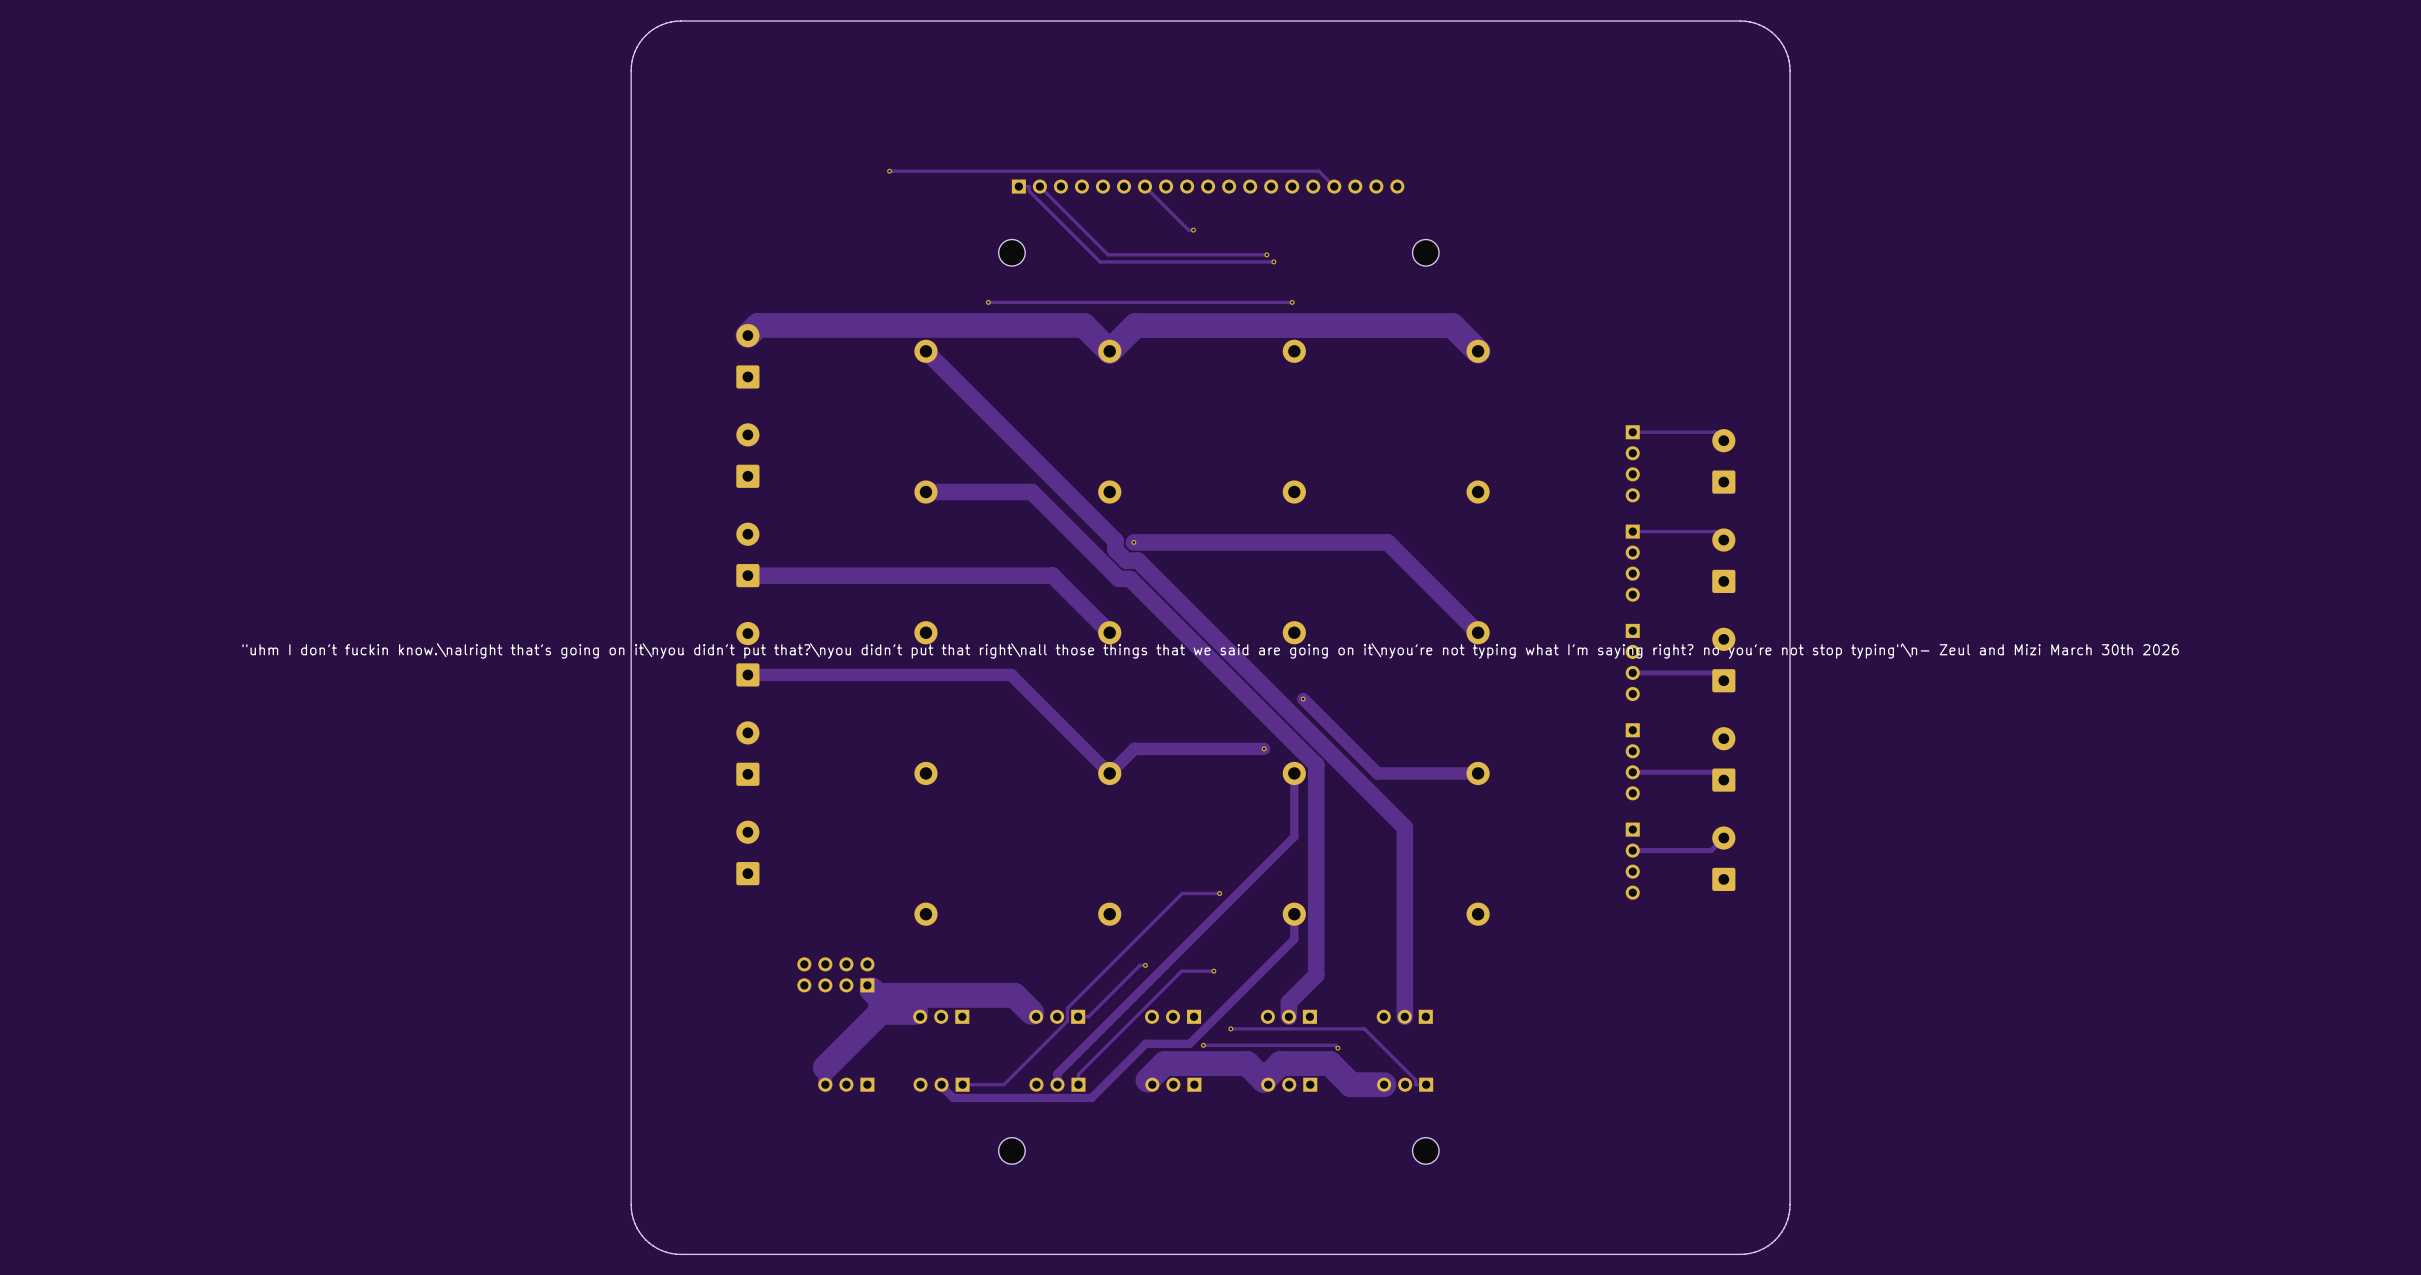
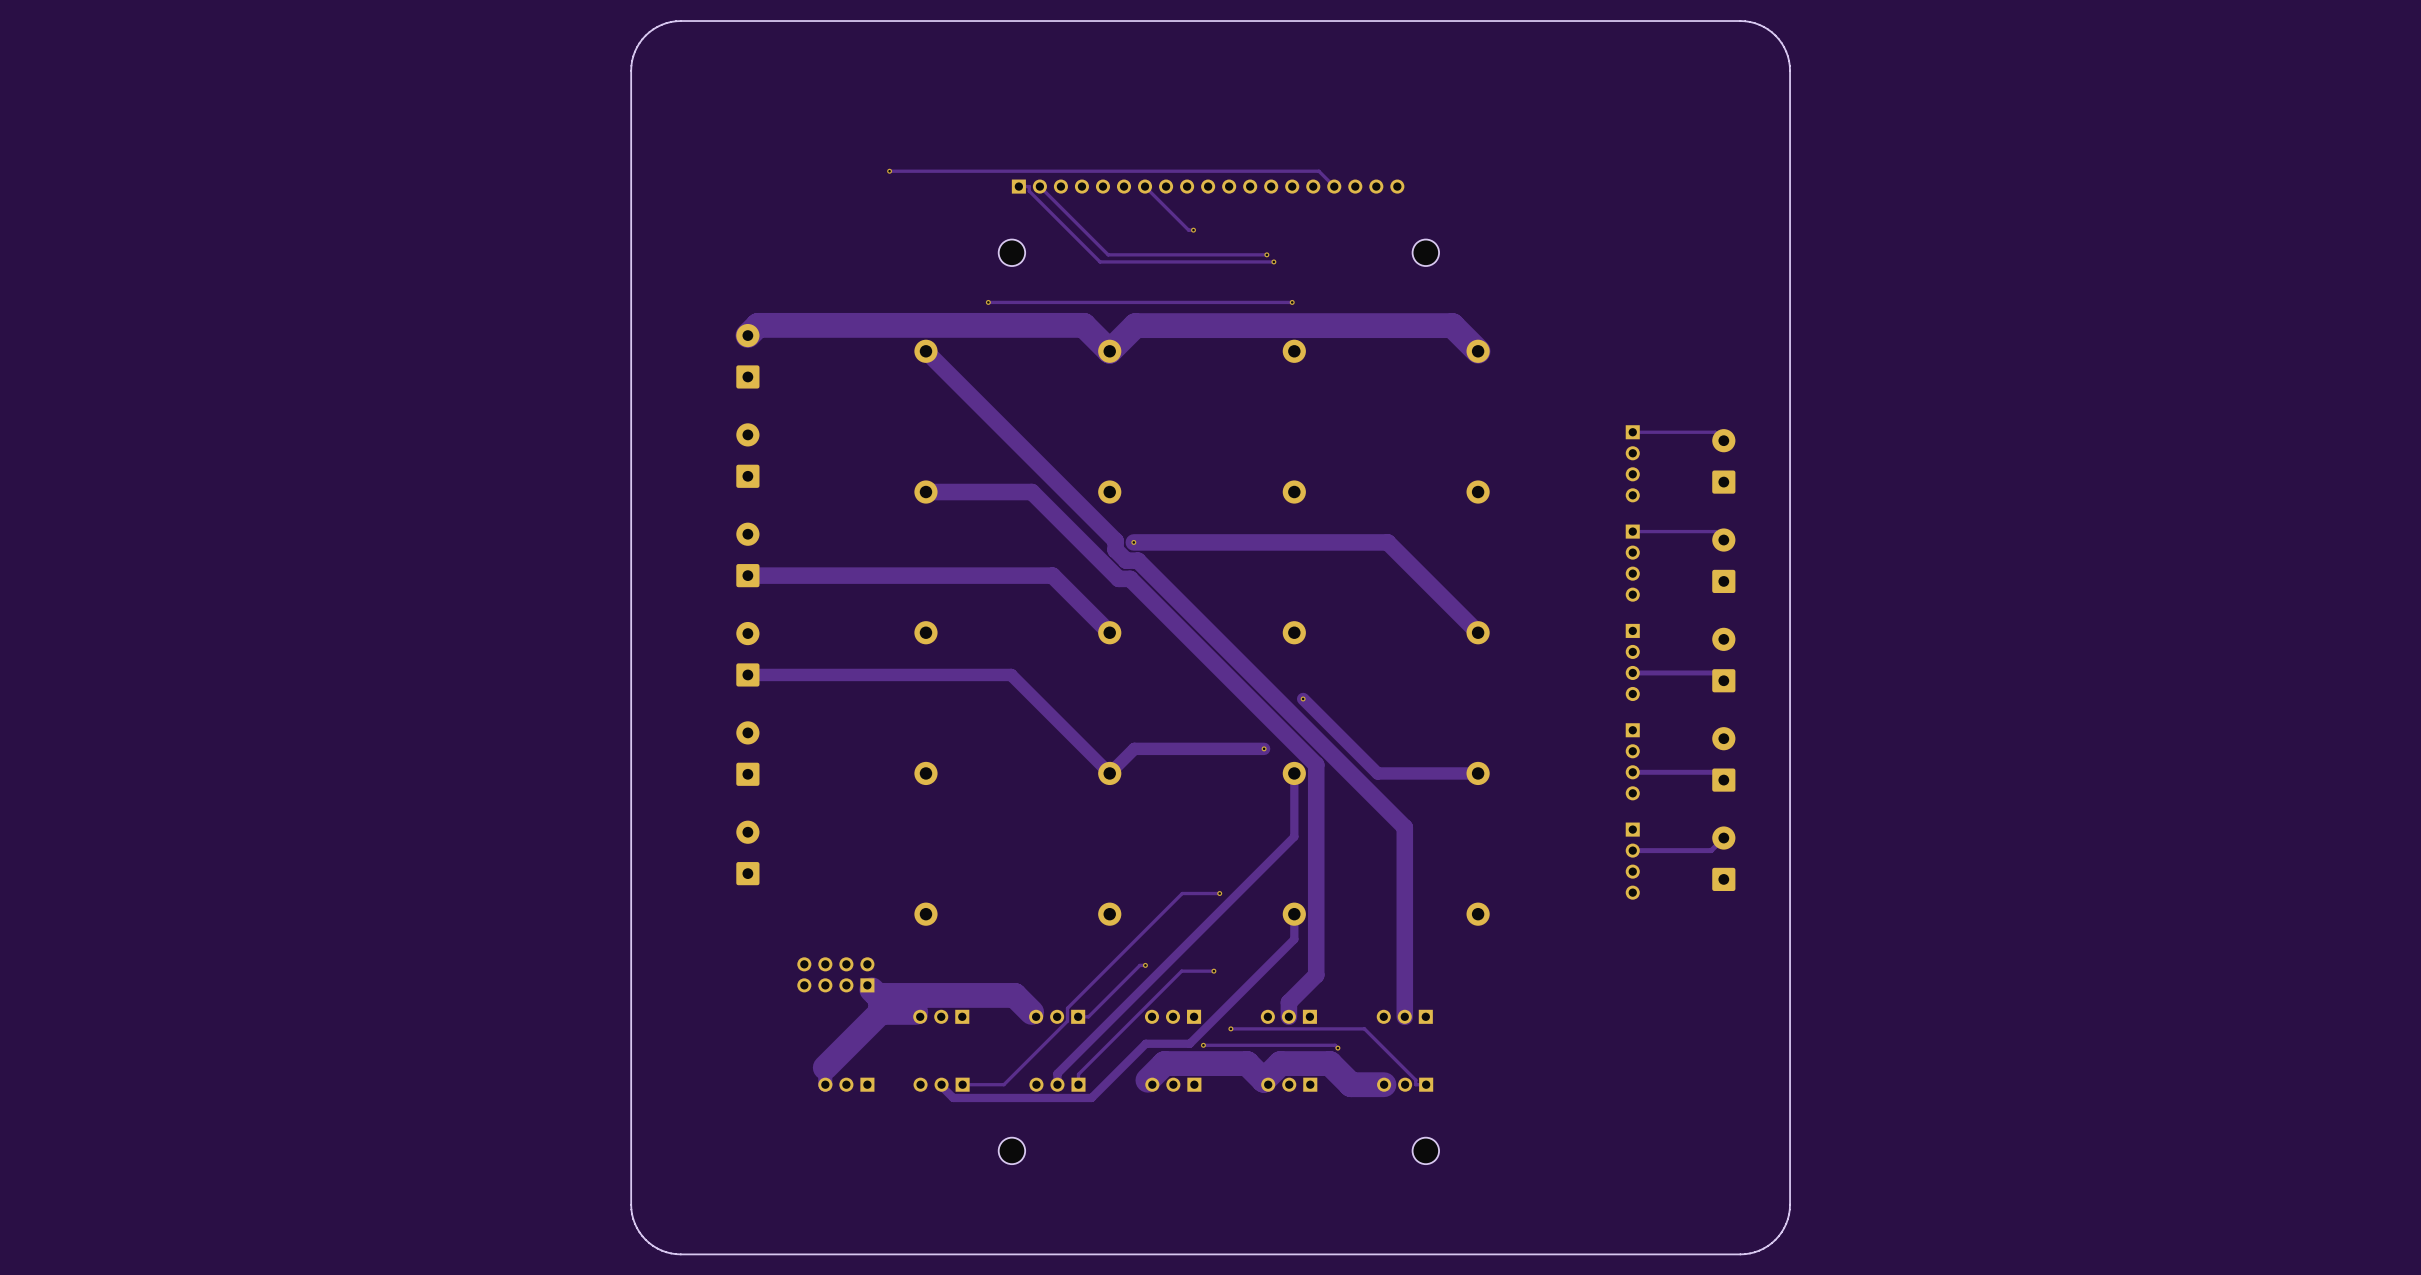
text: "uhm I don't fuckin know.\nalright that's going on it\nyou didn't put that?\nyou didn't put that right\nall those things that we said are going on it\nyou're not typing what I'm saying right? no you're not stop typing"\n- Zeul and Mizi March 30th 2026 (1210, 650) -> none

